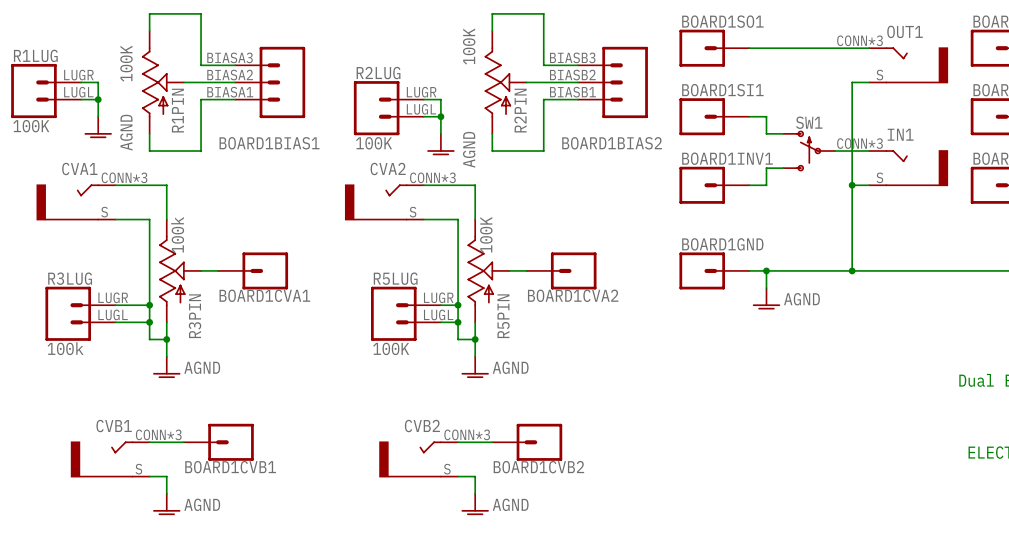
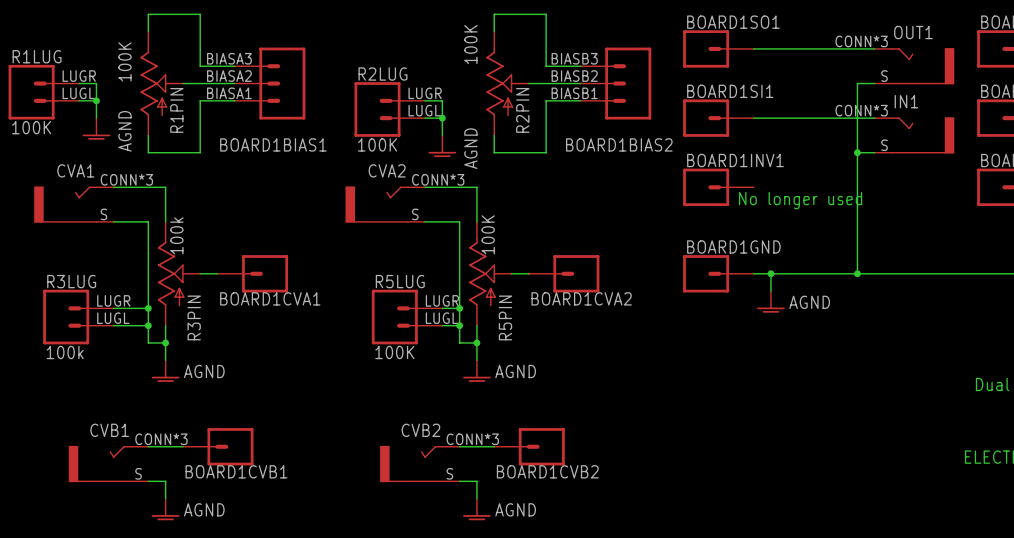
wire: (766, 116) (766, 133) (783, 133) -> (770, 118) (874, 118)
SW1: (809, 151) -> none
wire: (835, 151) (852, 151) -> none
wire: (783, 168) (766, 168) (766, 185) (749, 185) -> none
IN1 position: (908, 168) -> (914, 135)
wire: (852, 185) (869, 185) -> none
junction position: (852, 185) -> (857, 152)
text: none -> No longer used (800, 200)

